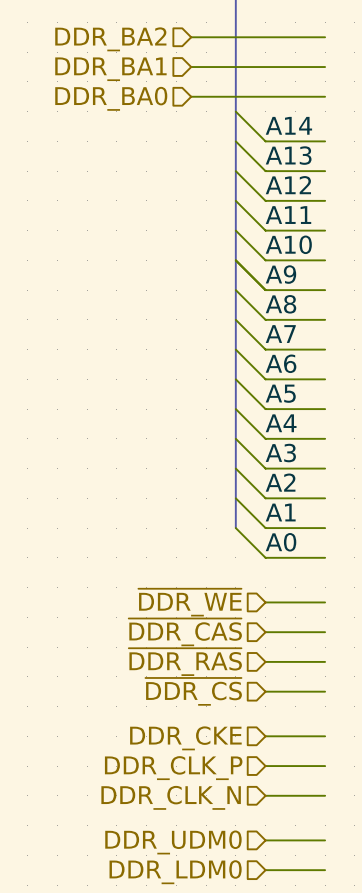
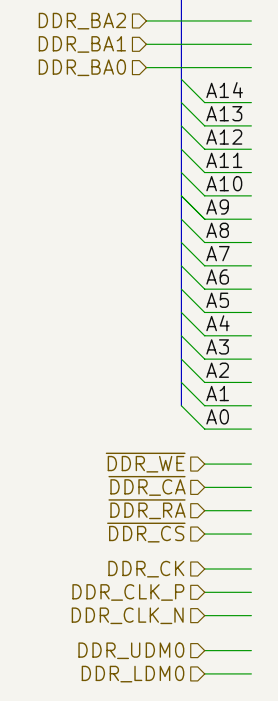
hierarchical label: ~{DDR_CAS} (185, 632) -> ~{DDR_CA} (147, 485)
hierarchical label: ~{DDR_RAS} (185, 662) -> ~{DDR_RA} (147, 509)
hierarchical label: DDR_CKE (185, 738) -> DDR_CK (146, 569)

